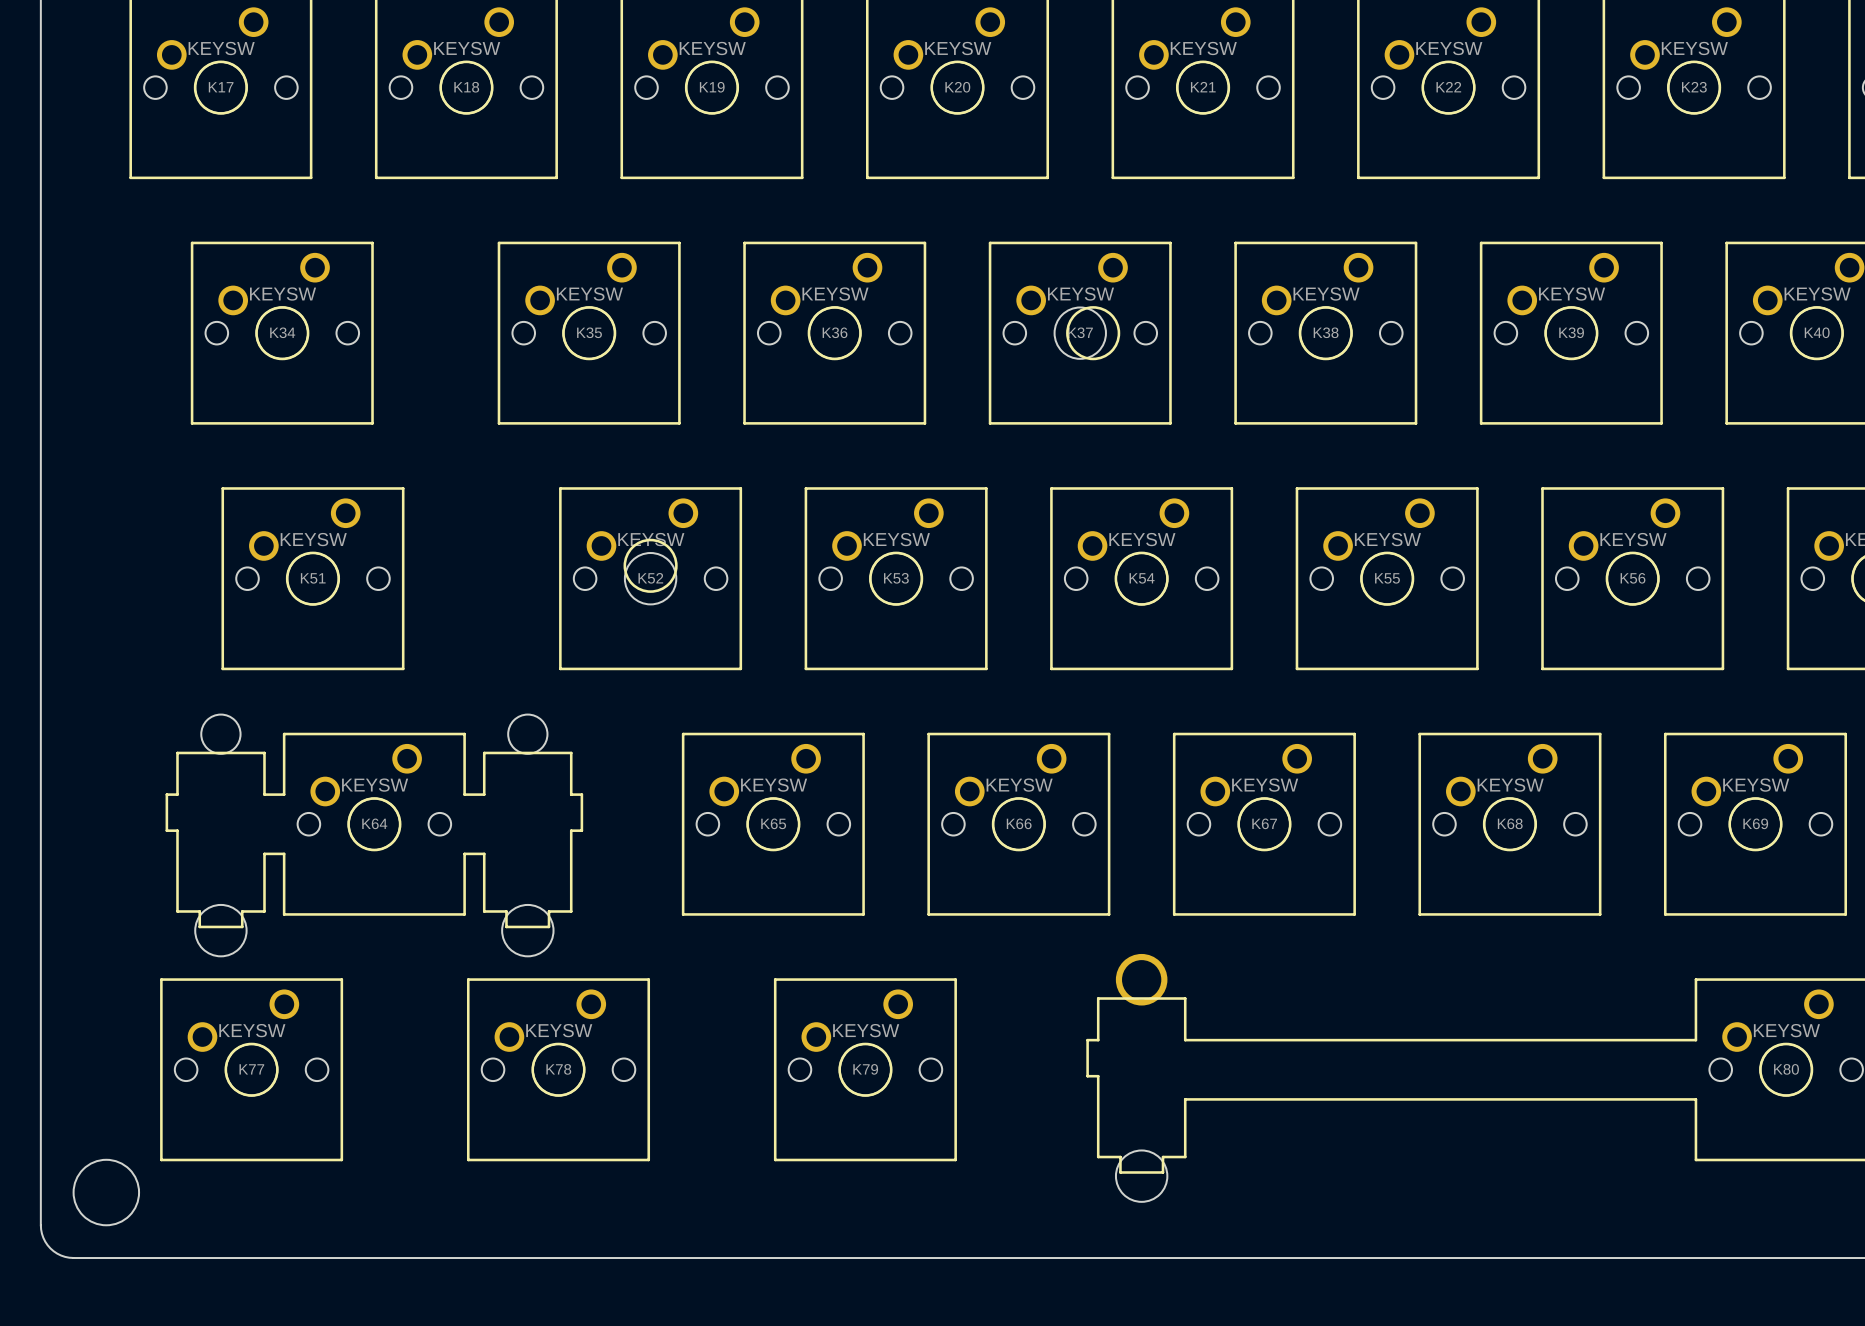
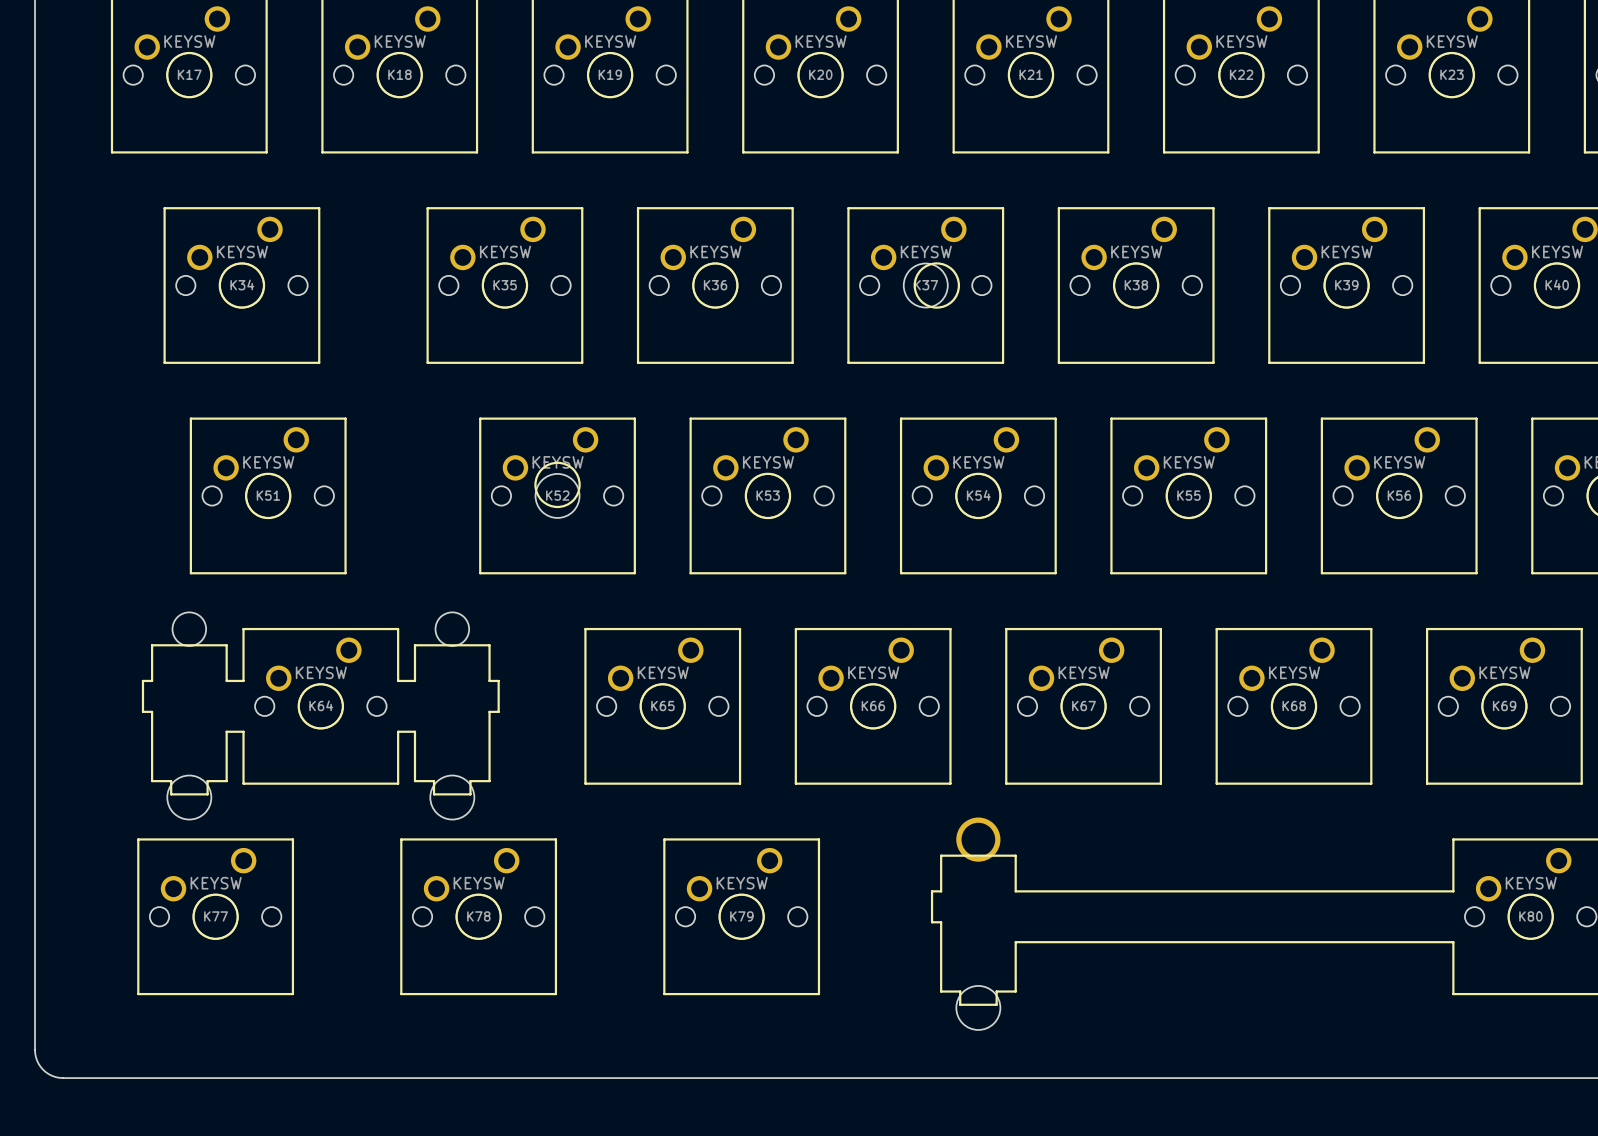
round board edge: [72, 1159, 140, 1226] -> none

